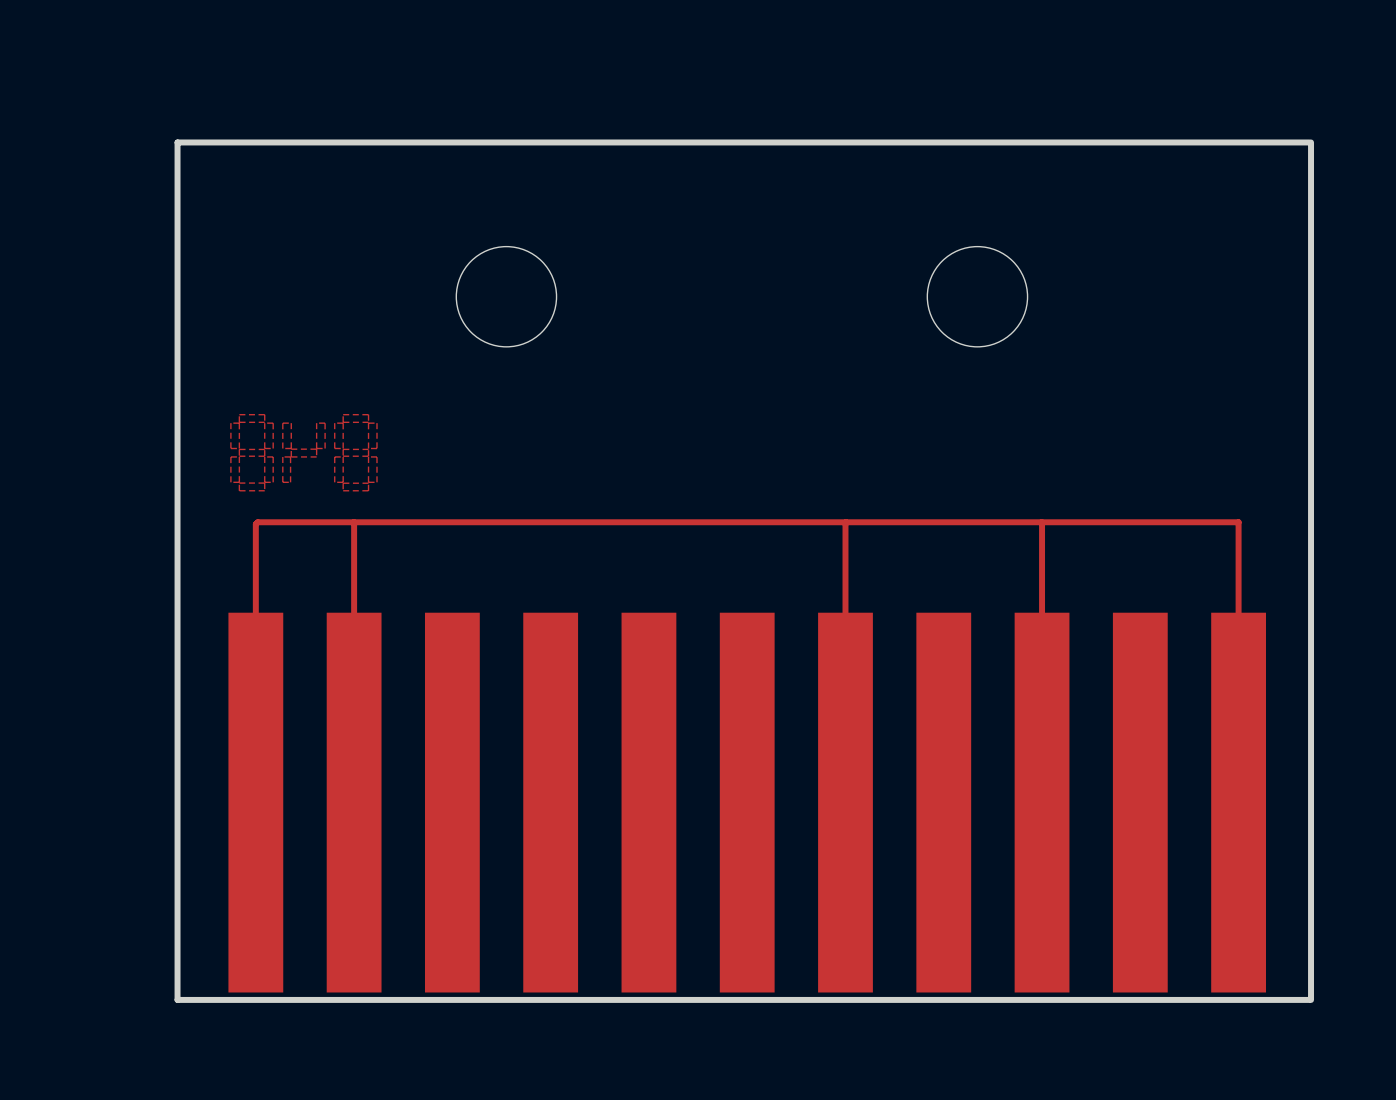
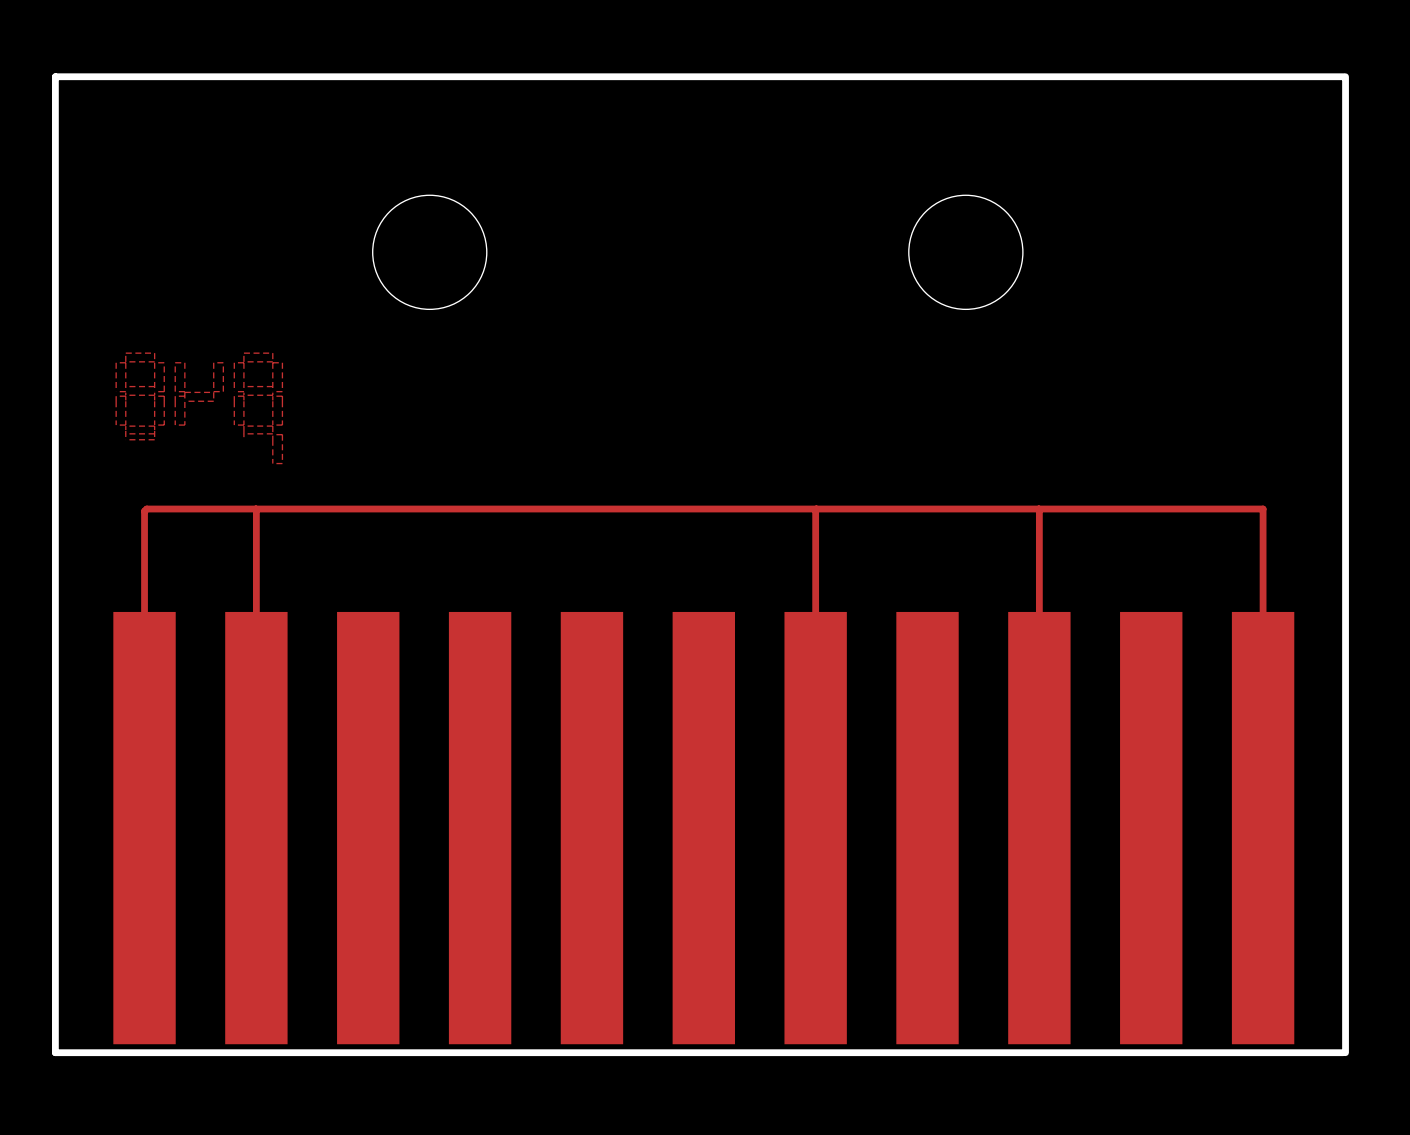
top zone outline: none -> (223, 362) (213, 362) (213, 391) (223, 391) (223, 362)
top zone outline: (239, 419) (239, 420) -> (125, 386) (125, 362) (116, 362) (116, 391) (125, 391)
top zone outline: (264, 419) (264, 420) -> (154, 386) (154, 362) (164, 362) (164, 391) (154, 391)
top zone outline: (343, 419) (343, 420) -> (243, 386) (243, 362) (234, 362) (234, 391) (243, 391)
top zone outline: (368, 419) (368, 420) -> (272, 386) (272, 362) (282, 362) (282, 391) (272, 391)
top zone outline: (316, 423) (325, 423) (325, 448) (316, 448) (316, 427) -> (213, 396) (213, 392) (184, 392) (184, 396)
top zone outline: none -> (213, 401) (184, 401)
top zone outline: (316, 449) (316, 456) (291, 456) (291, 449) (316, 449) -> (154, 353) (154, 361) (125, 361) (125, 353) (154, 353)
top zone outline: (239, 456) (230, 456) (230, 482) (239, 482) (239, 461) -> none
top zone outline: (264, 456) (273, 456) (273, 482) (264, 482) (264, 461) -> (125, 439) (154, 439)
top zone outline: (290, 456) (282, 456) (282, 482) (290, 482) (290, 456) -> (184, 362) (175, 362) (175, 391) (184, 391) (184, 362)
top zone outline: (343, 456) (334, 456) (334, 482) (343, 482) (343, 461) -> none
top zone outline: (264, 483) (239, 483) (239, 490) (264, 490) (264, 483) -> none
top zone outline: (368, 483) (368, 490) (343, 490) (343, 483) (368, 483) -> (272, 353) (272, 361) (243, 361) (243, 353) (272, 353)

